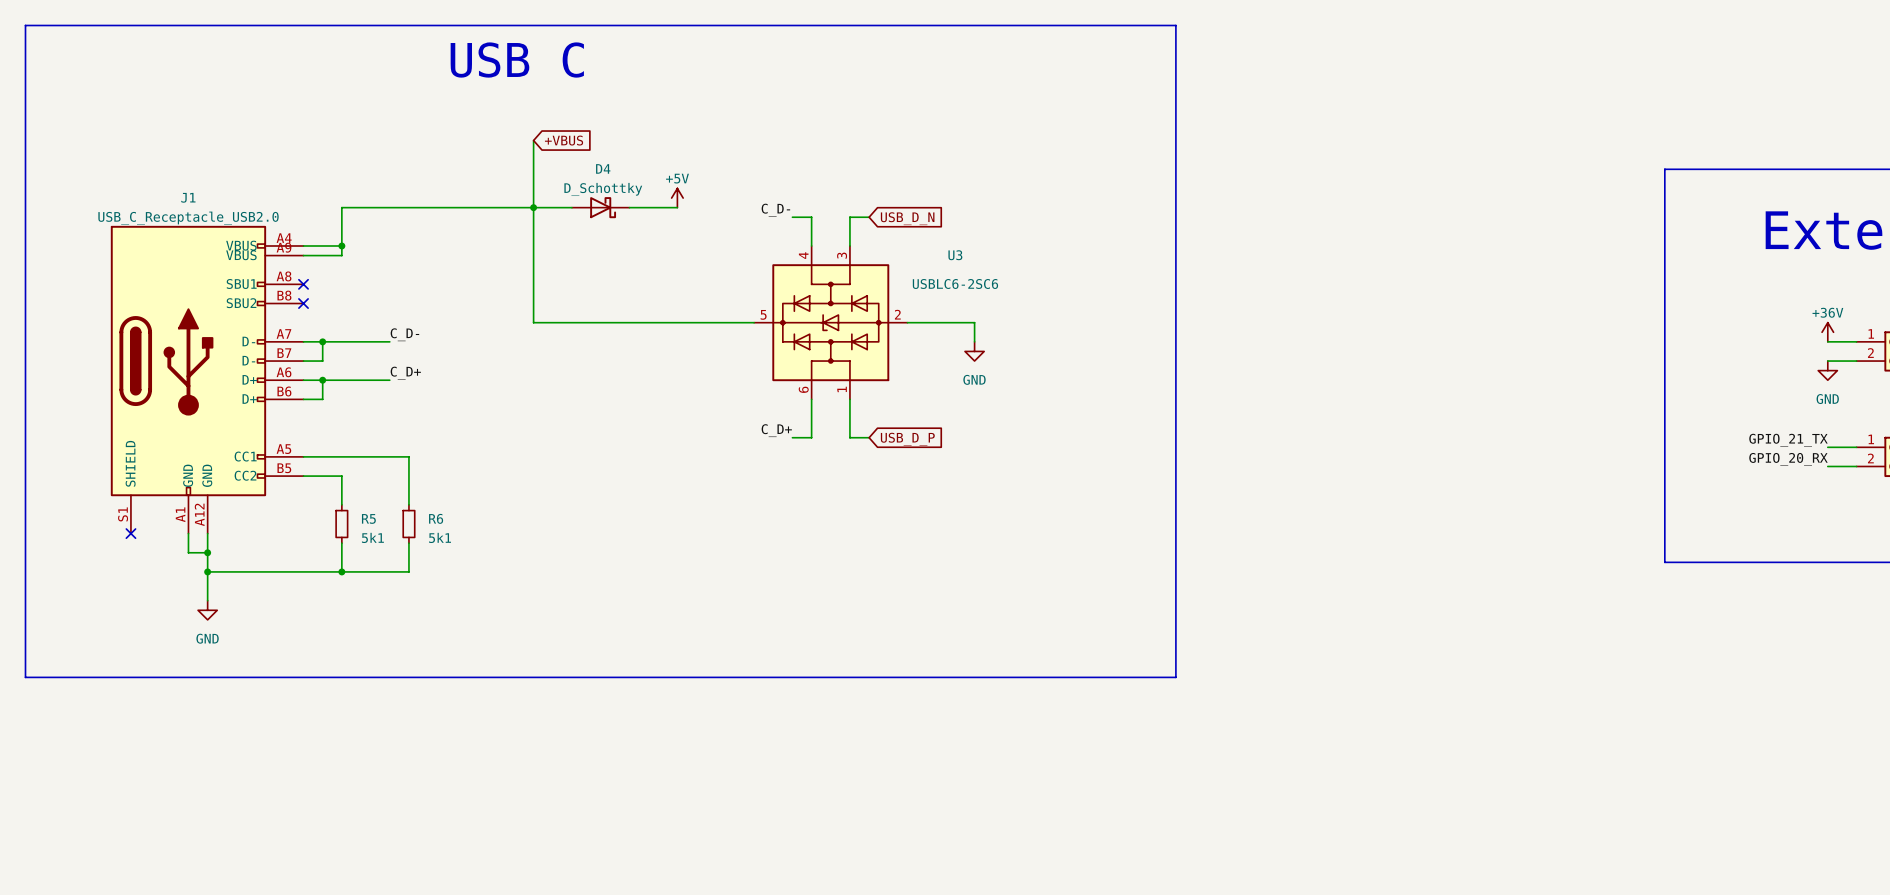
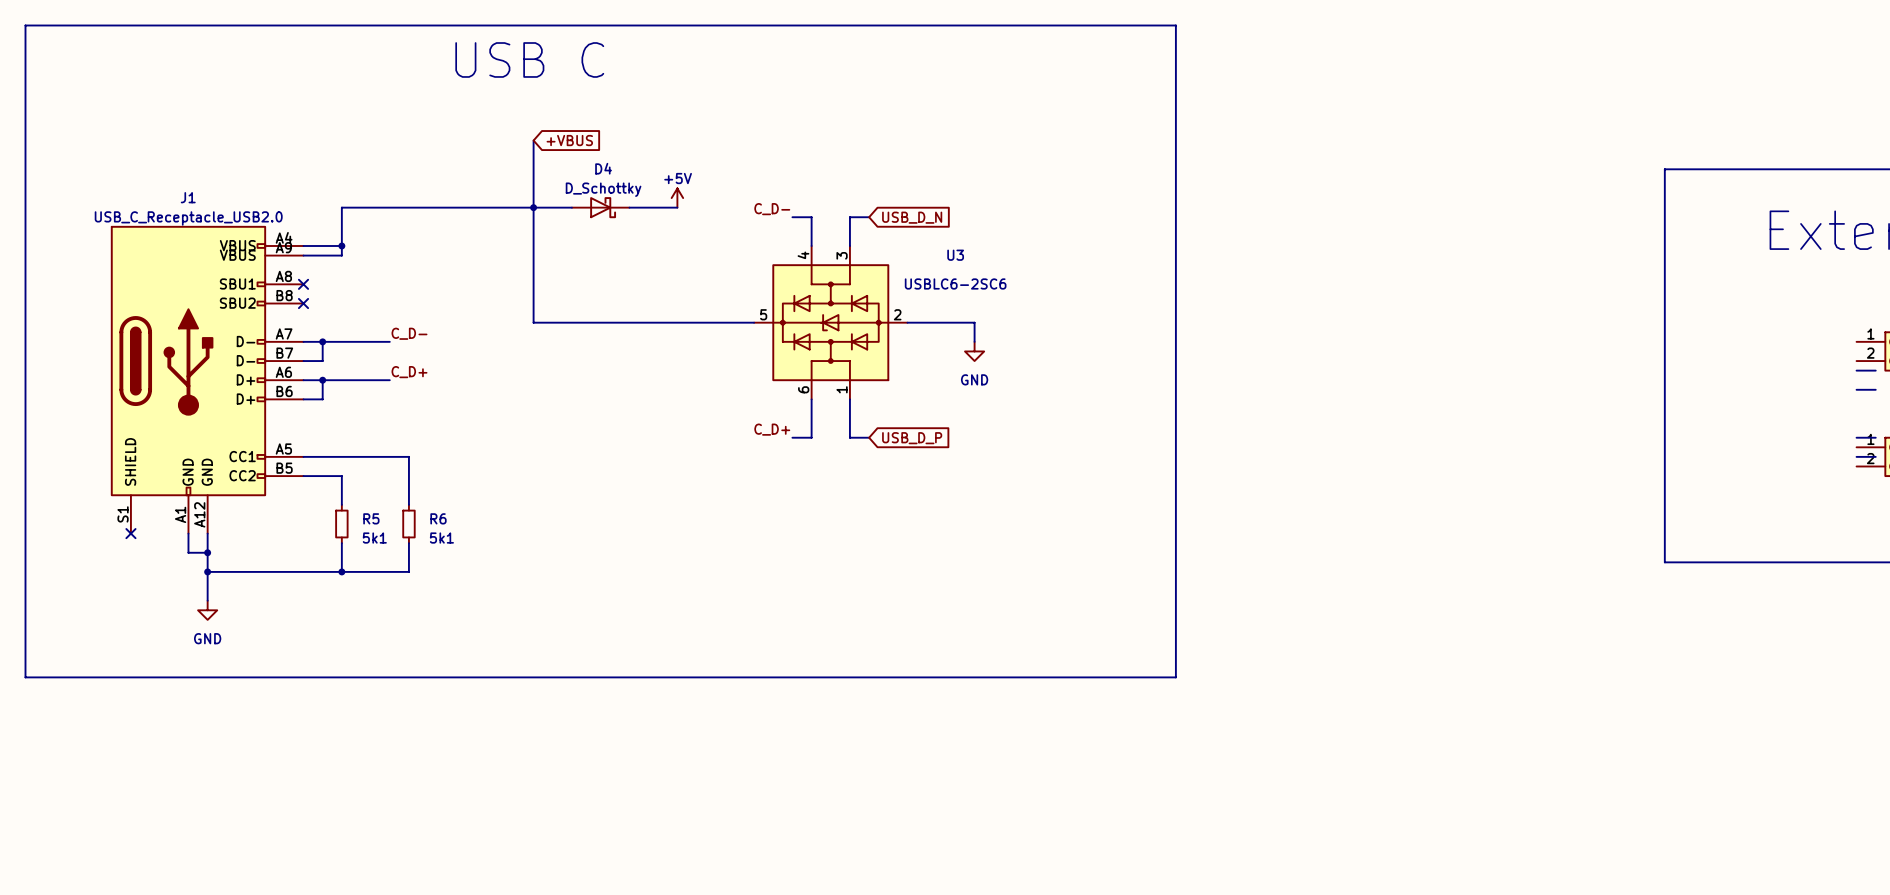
power symbol: +36V (1827, 332) -> none
wire: (1827, 341) (1856, 341) -> none
wire: (1827, 361) (1856, 361) -> none
power symbol: GND (1827, 370) -> none
wire: none -> (1856, 370) (1875, 370)
wire: none -> (1856, 389) (1875, 389)
wire: none -> (1856, 437) (1875, 437)
label: GPIO_21_TX (1788, 440) -> none
wire: (1827, 447) (1856, 447) -> none
wire: none -> (1856, 456) (1875, 456)
label: GPIO_20_RX (1788, 459) -> none
wire: (1827, 466) (1856, 466) -> none

